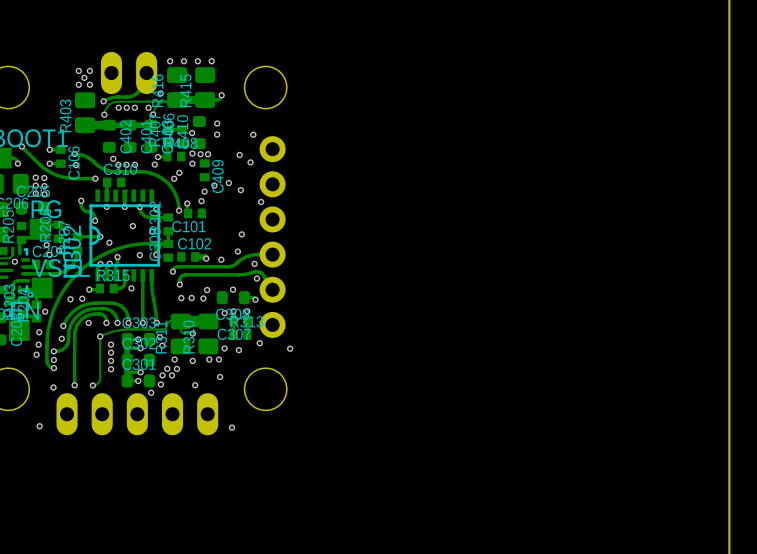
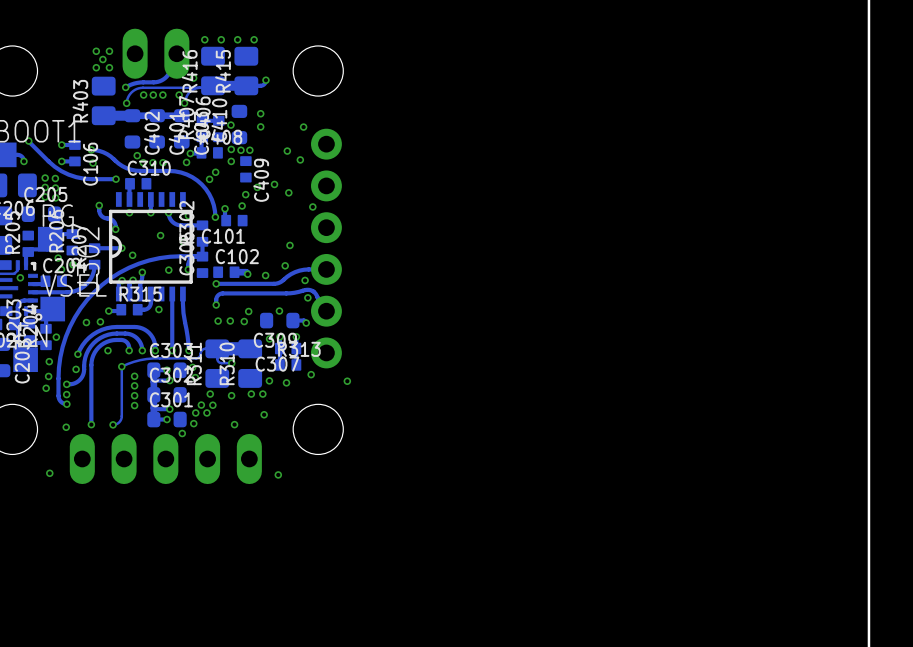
track: (179, 266) (174, 267) (172, 271) -> none
via: none -> (216, 283)
via: (172, 271) -> none

